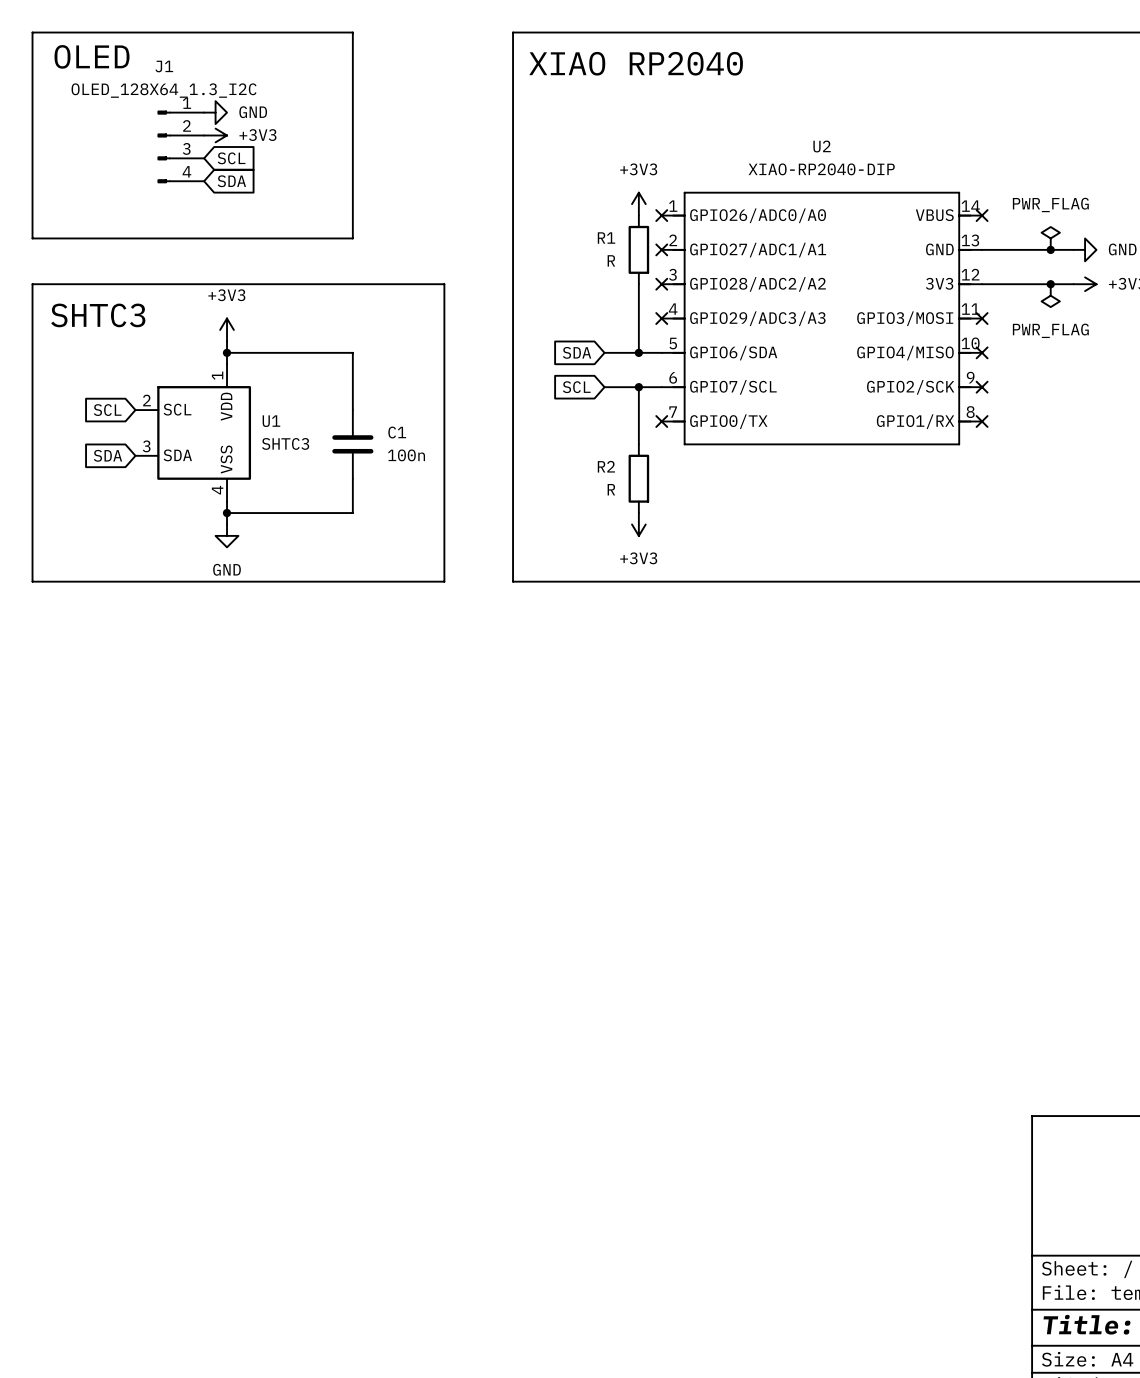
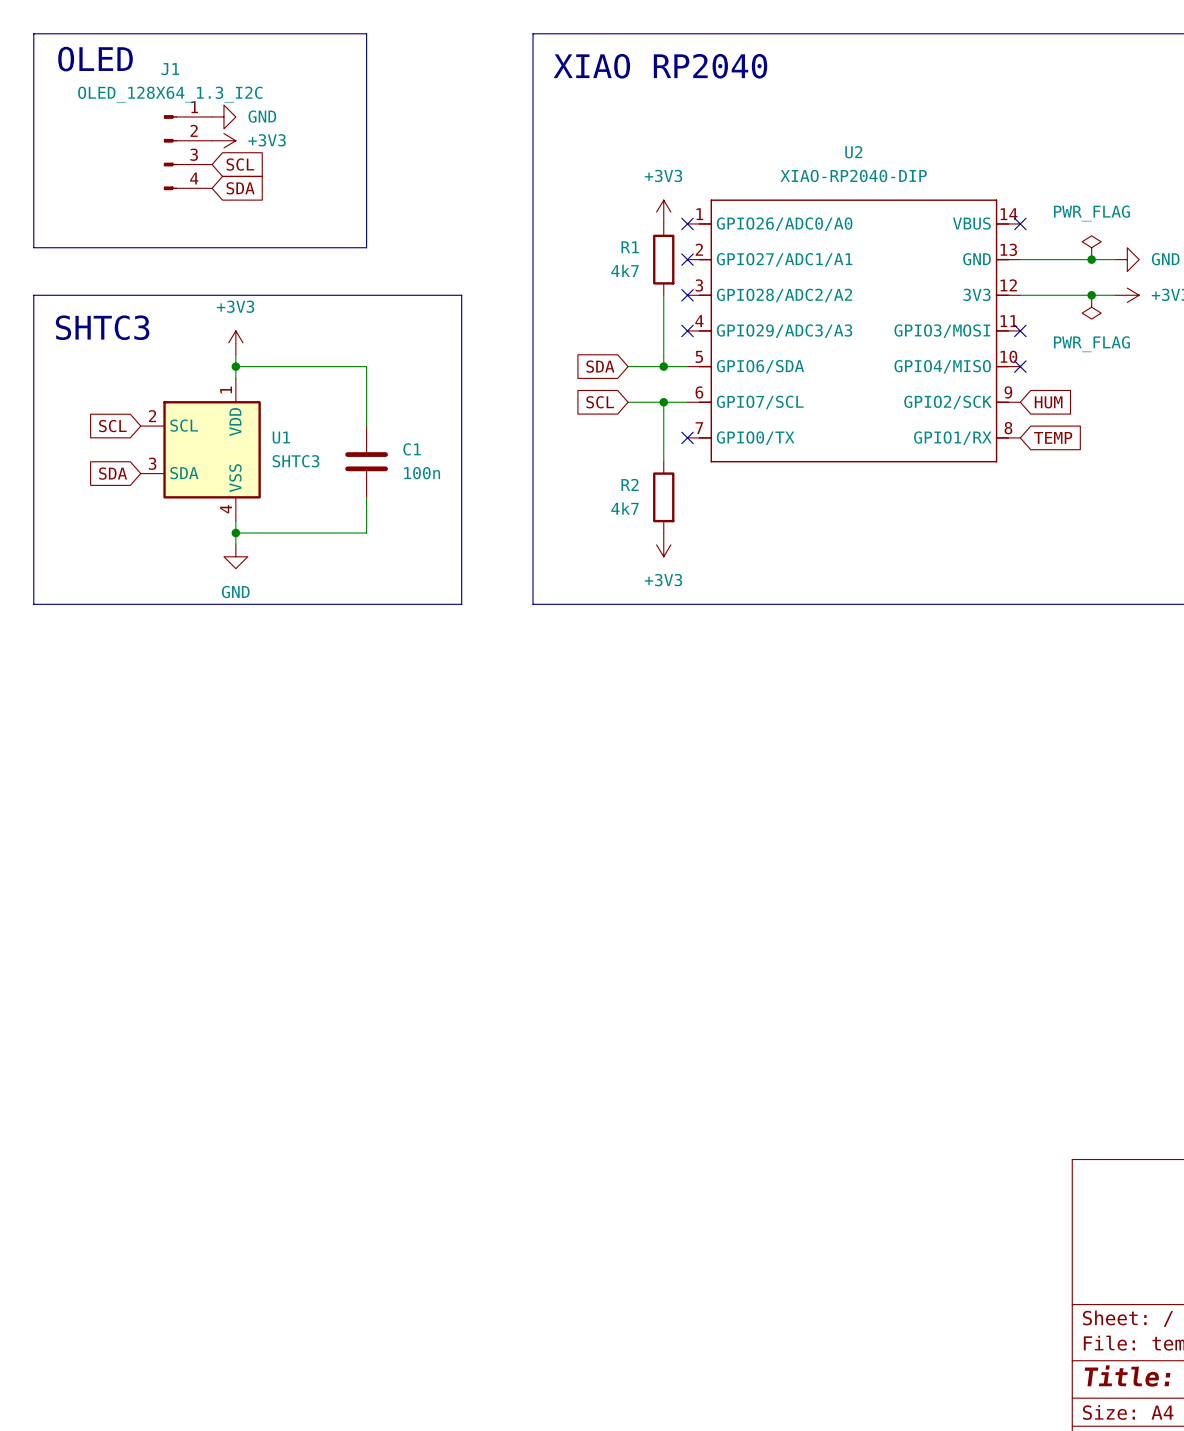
R1 value: R (611, 260) -> 4k7 (625, 270)
no-connect mark: (982, 387) -> none
global label: none -> HUM (1048, 402)
no-connect mark: (982, 421) -> none
global label: none -> TEMP (1053, 437)
R2 value: R (611, 489) -> 4k7 (625, 508)

